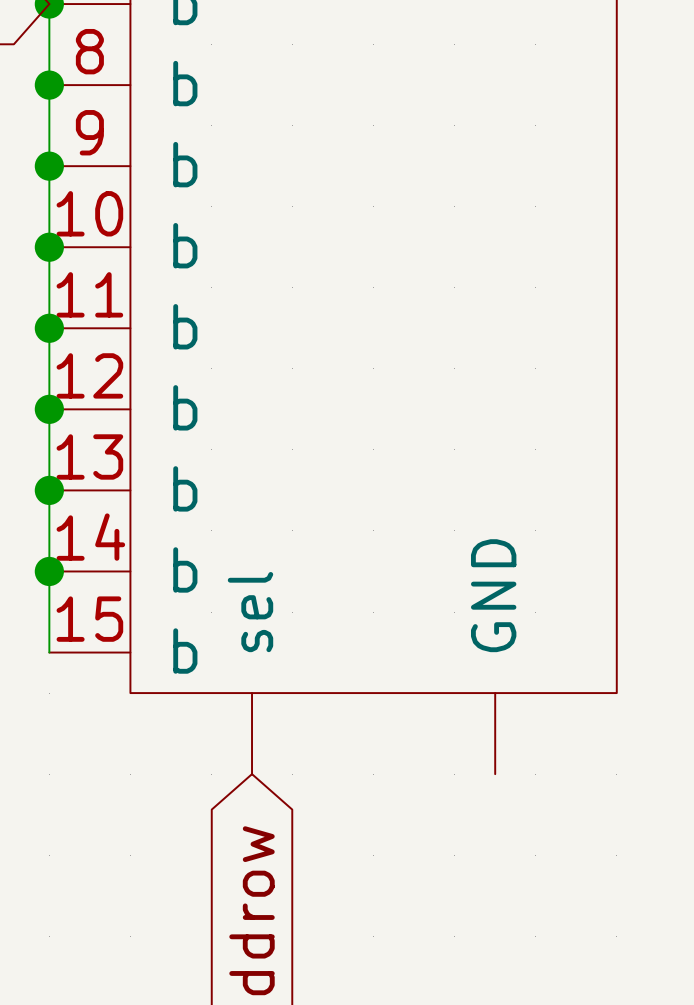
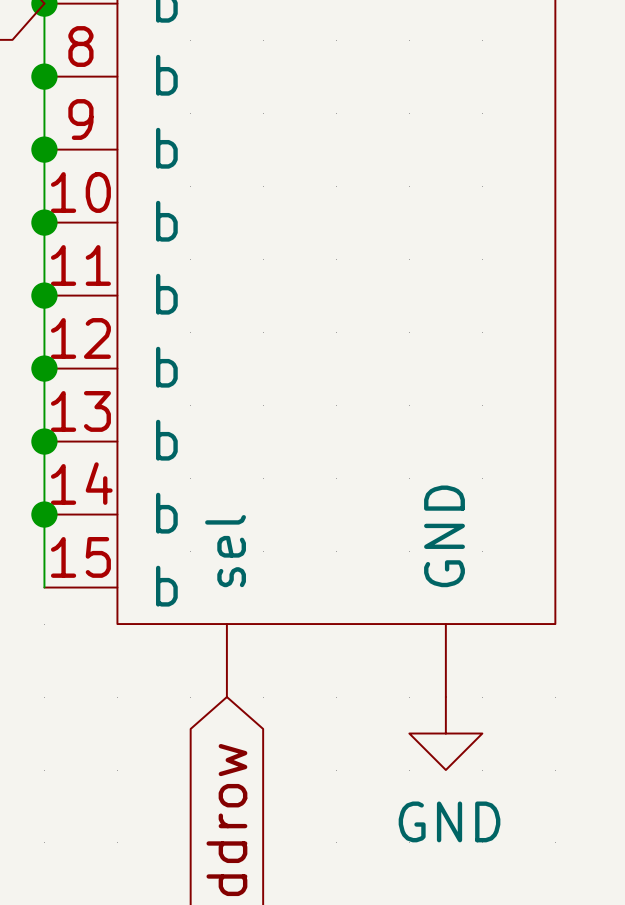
power symbol: none -> GND (445, 733)

